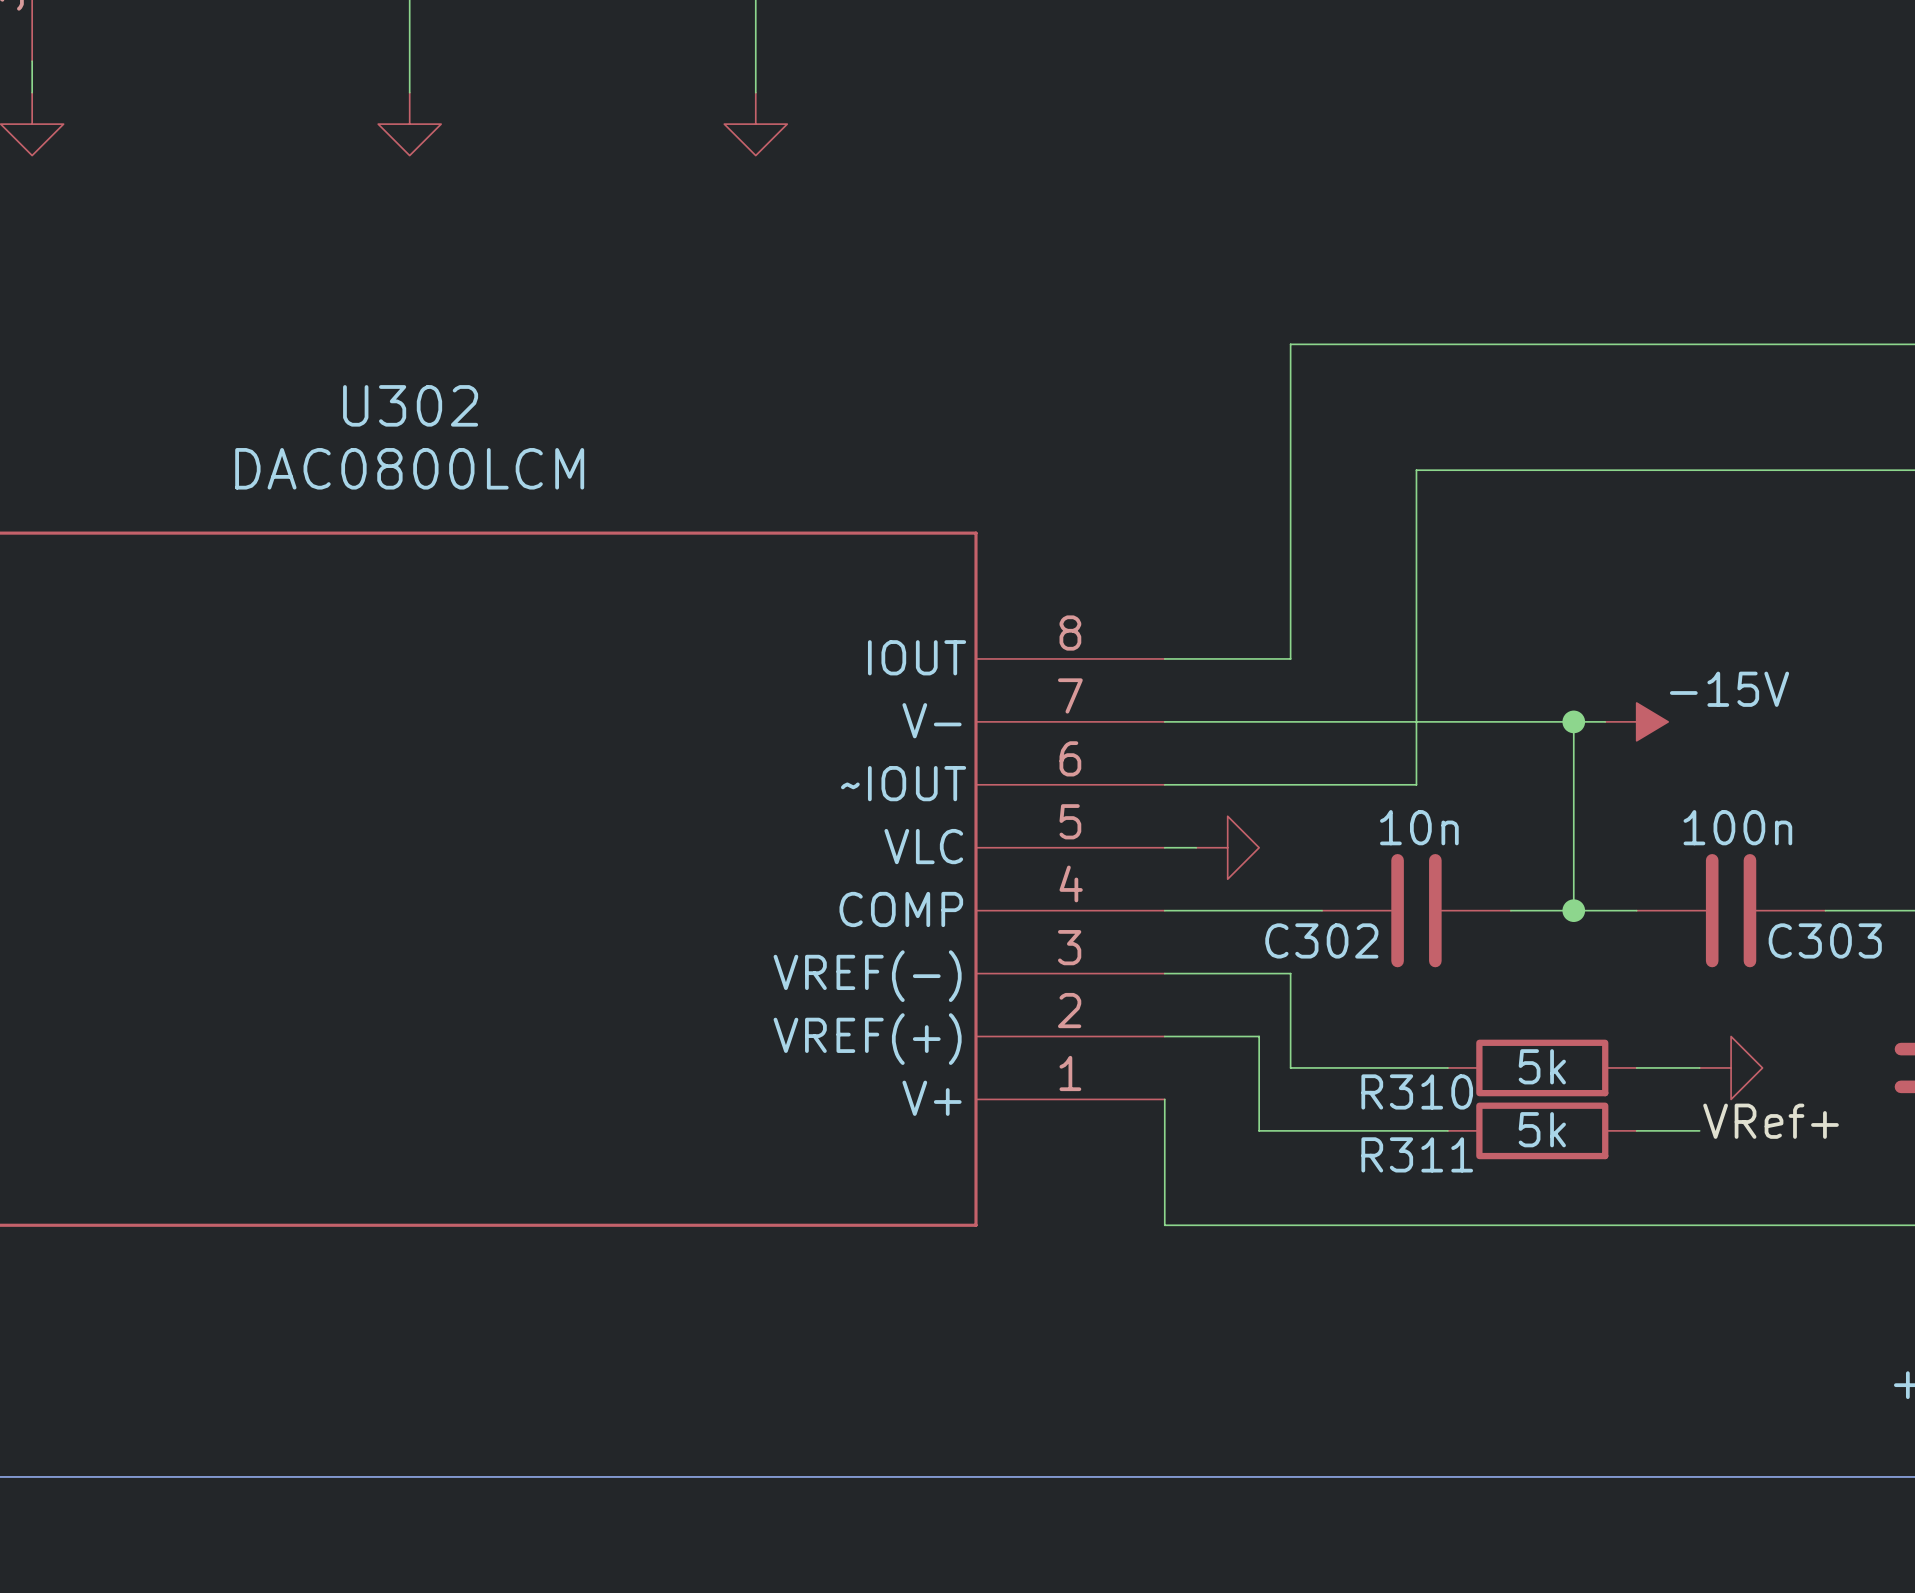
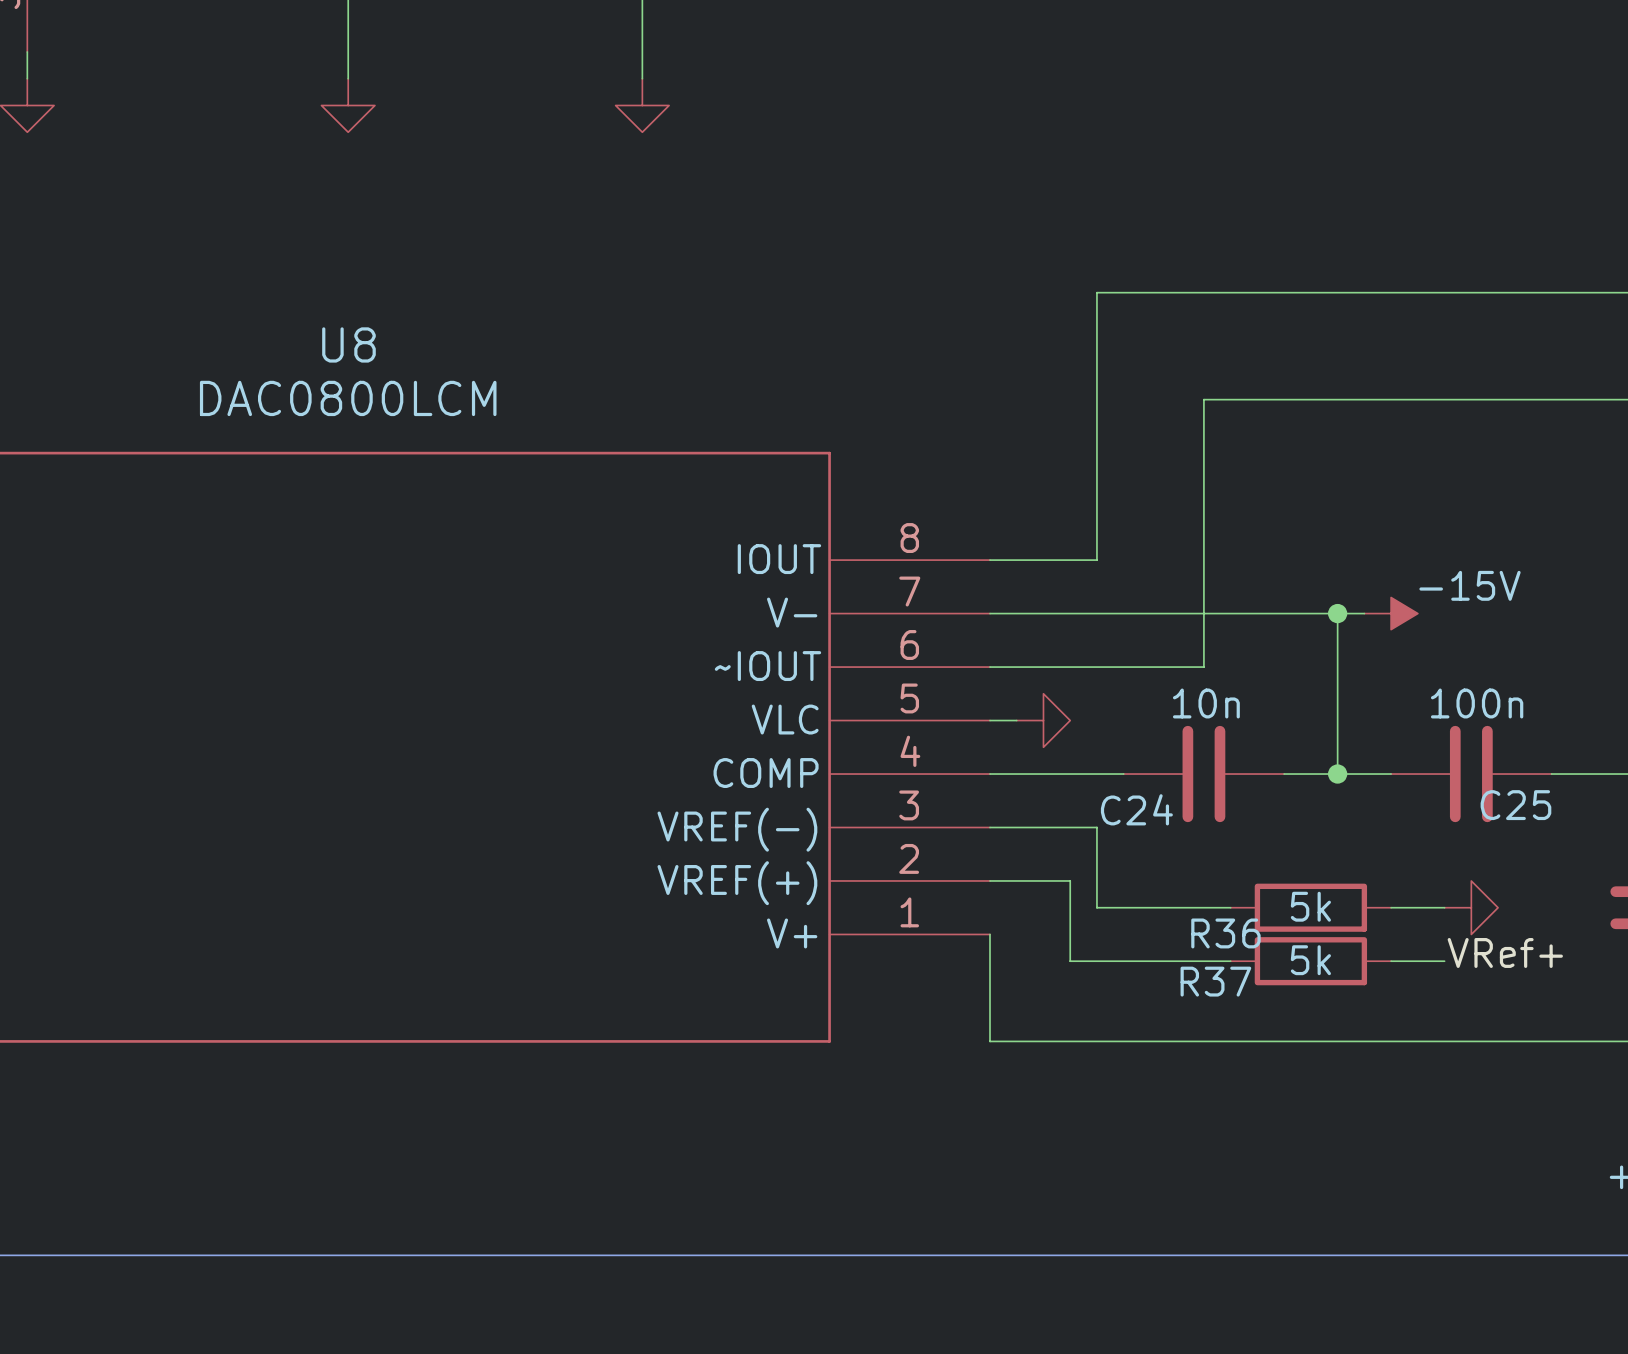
U302 name: U302 (410, 405) -> U8 (348, 344)
C302 name: C302 (1321, 940) -> C24 (1136, 809)
C303 name: C303 (1825, 940) -> C25 (1515, 805)
R310 name: R310 (1417, 1091) -> R36 (1225, 933)
R311 name: R311 (1417, 1154) -> R37 (1215, 981)

